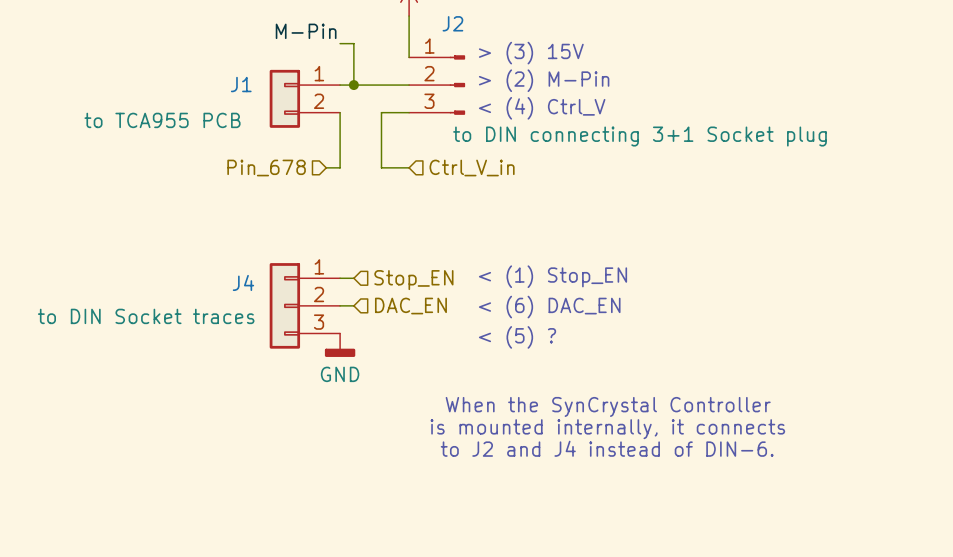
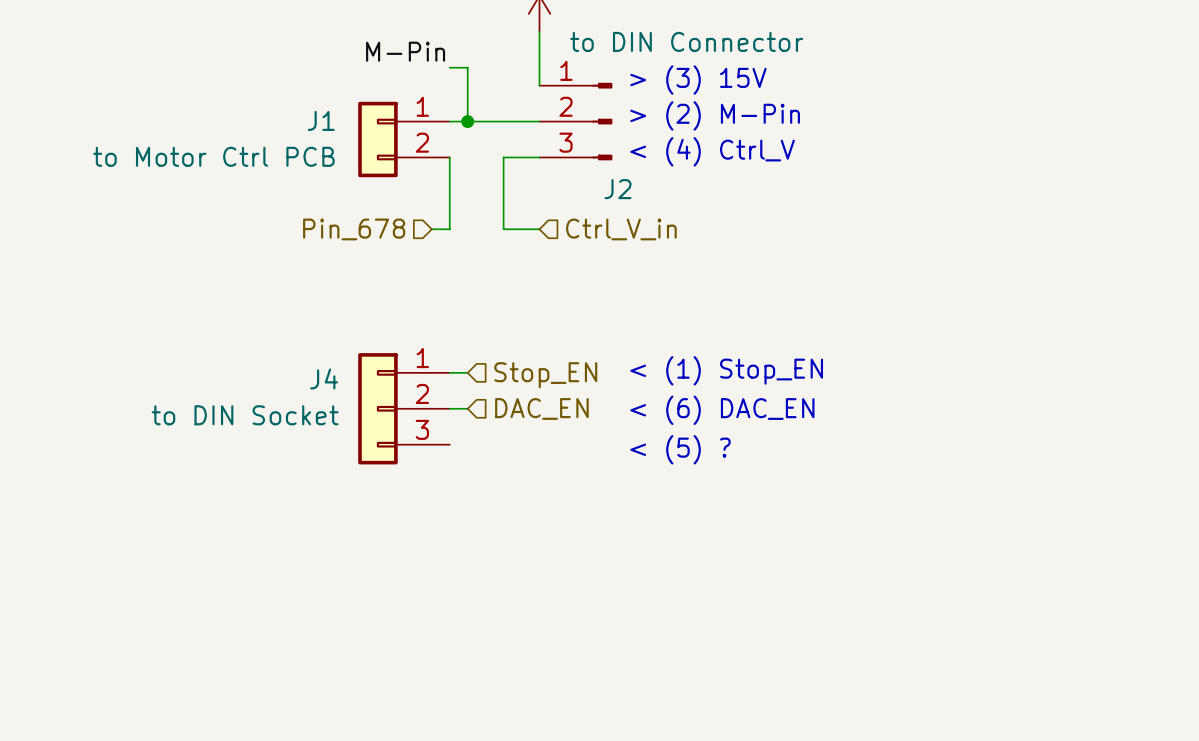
J2 name position: J2 (452, 23) -> J2 (618, 189)
J1 value: to TCA955 PCB (162, 120) -> to Motor Ctrl PCB (213, 156)
J2 value: to DIN connecting 3+1 Socket plug (639, 136) -> to DIN Connector (686, 41)
J4 value: to DIN Socket traces (146, 316) -> to DIN Socket (245, 415)
power symbol: GND (340, 345) -> none
text: When the SynCrystal Controller (608, 406) -> none
text: is mounted internally, it connects (607, 429) -> none
text: to J2 and J4 instead of DIN-6. (607, 448) -> none

